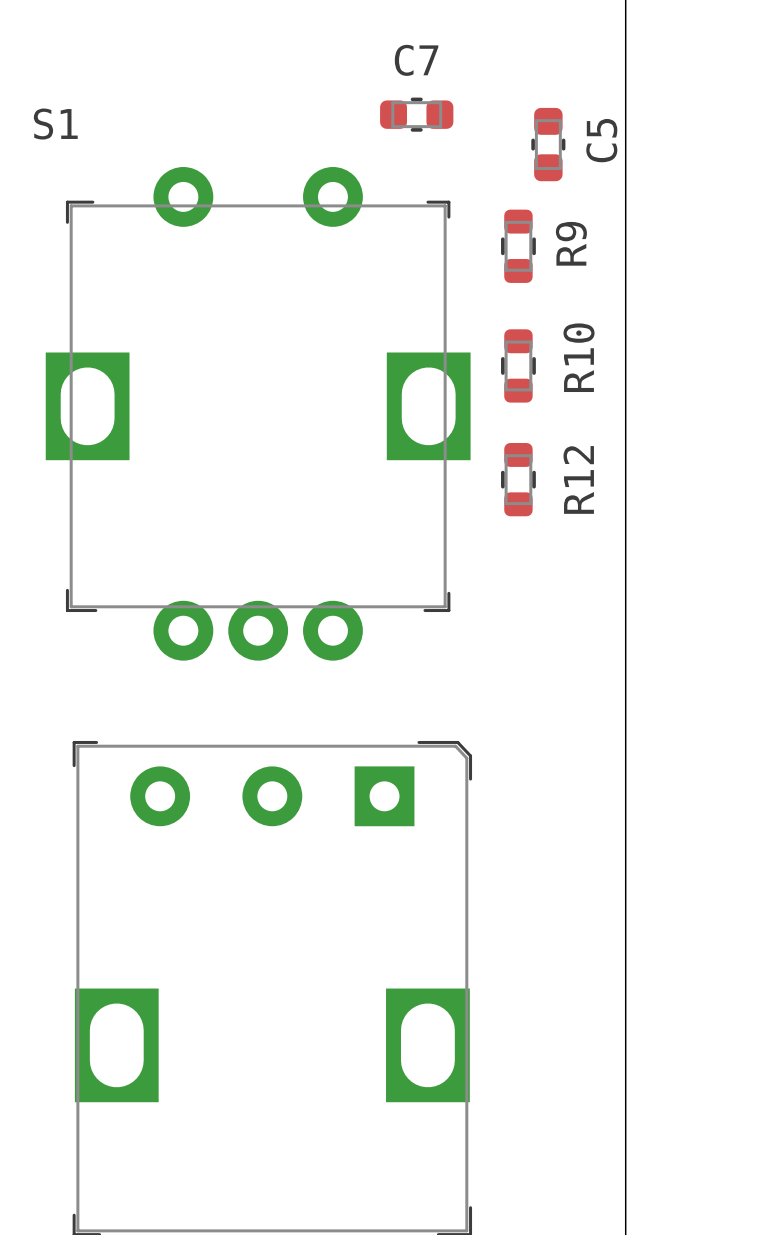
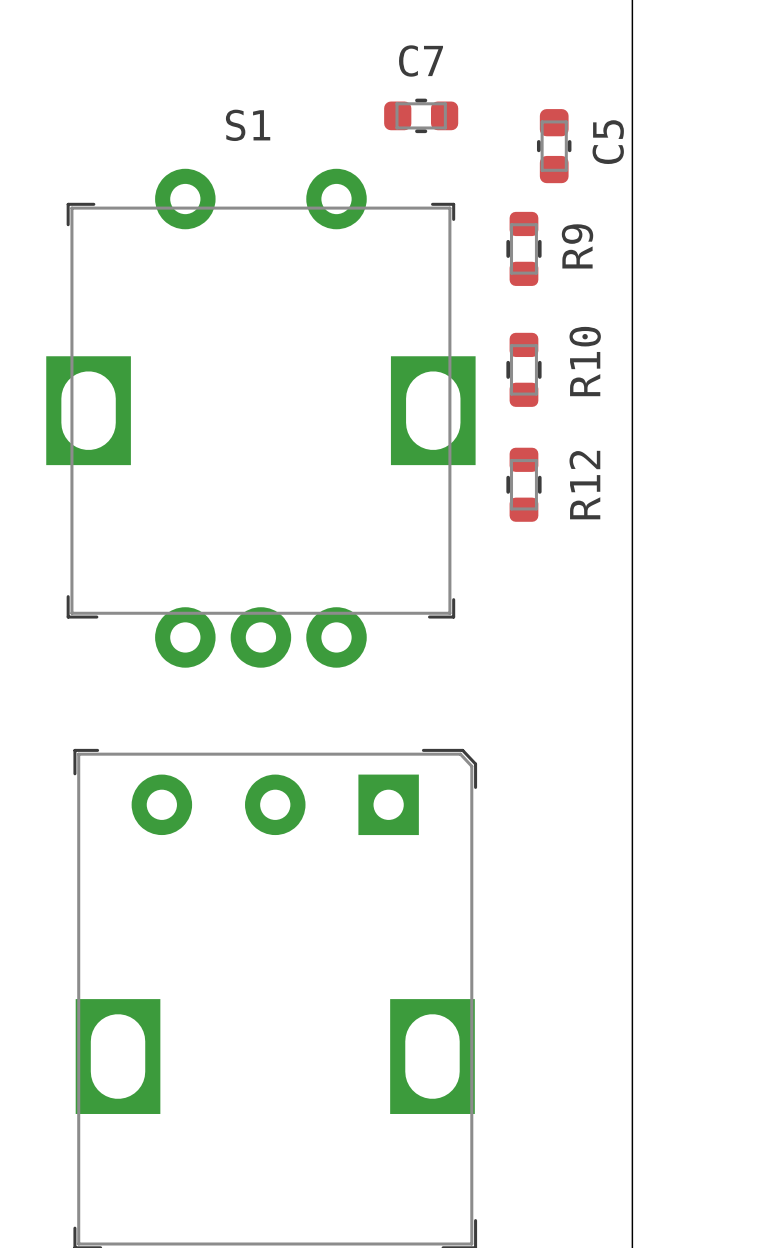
S1 name position: S1 (55, 124) -> S1 (248, 125)

